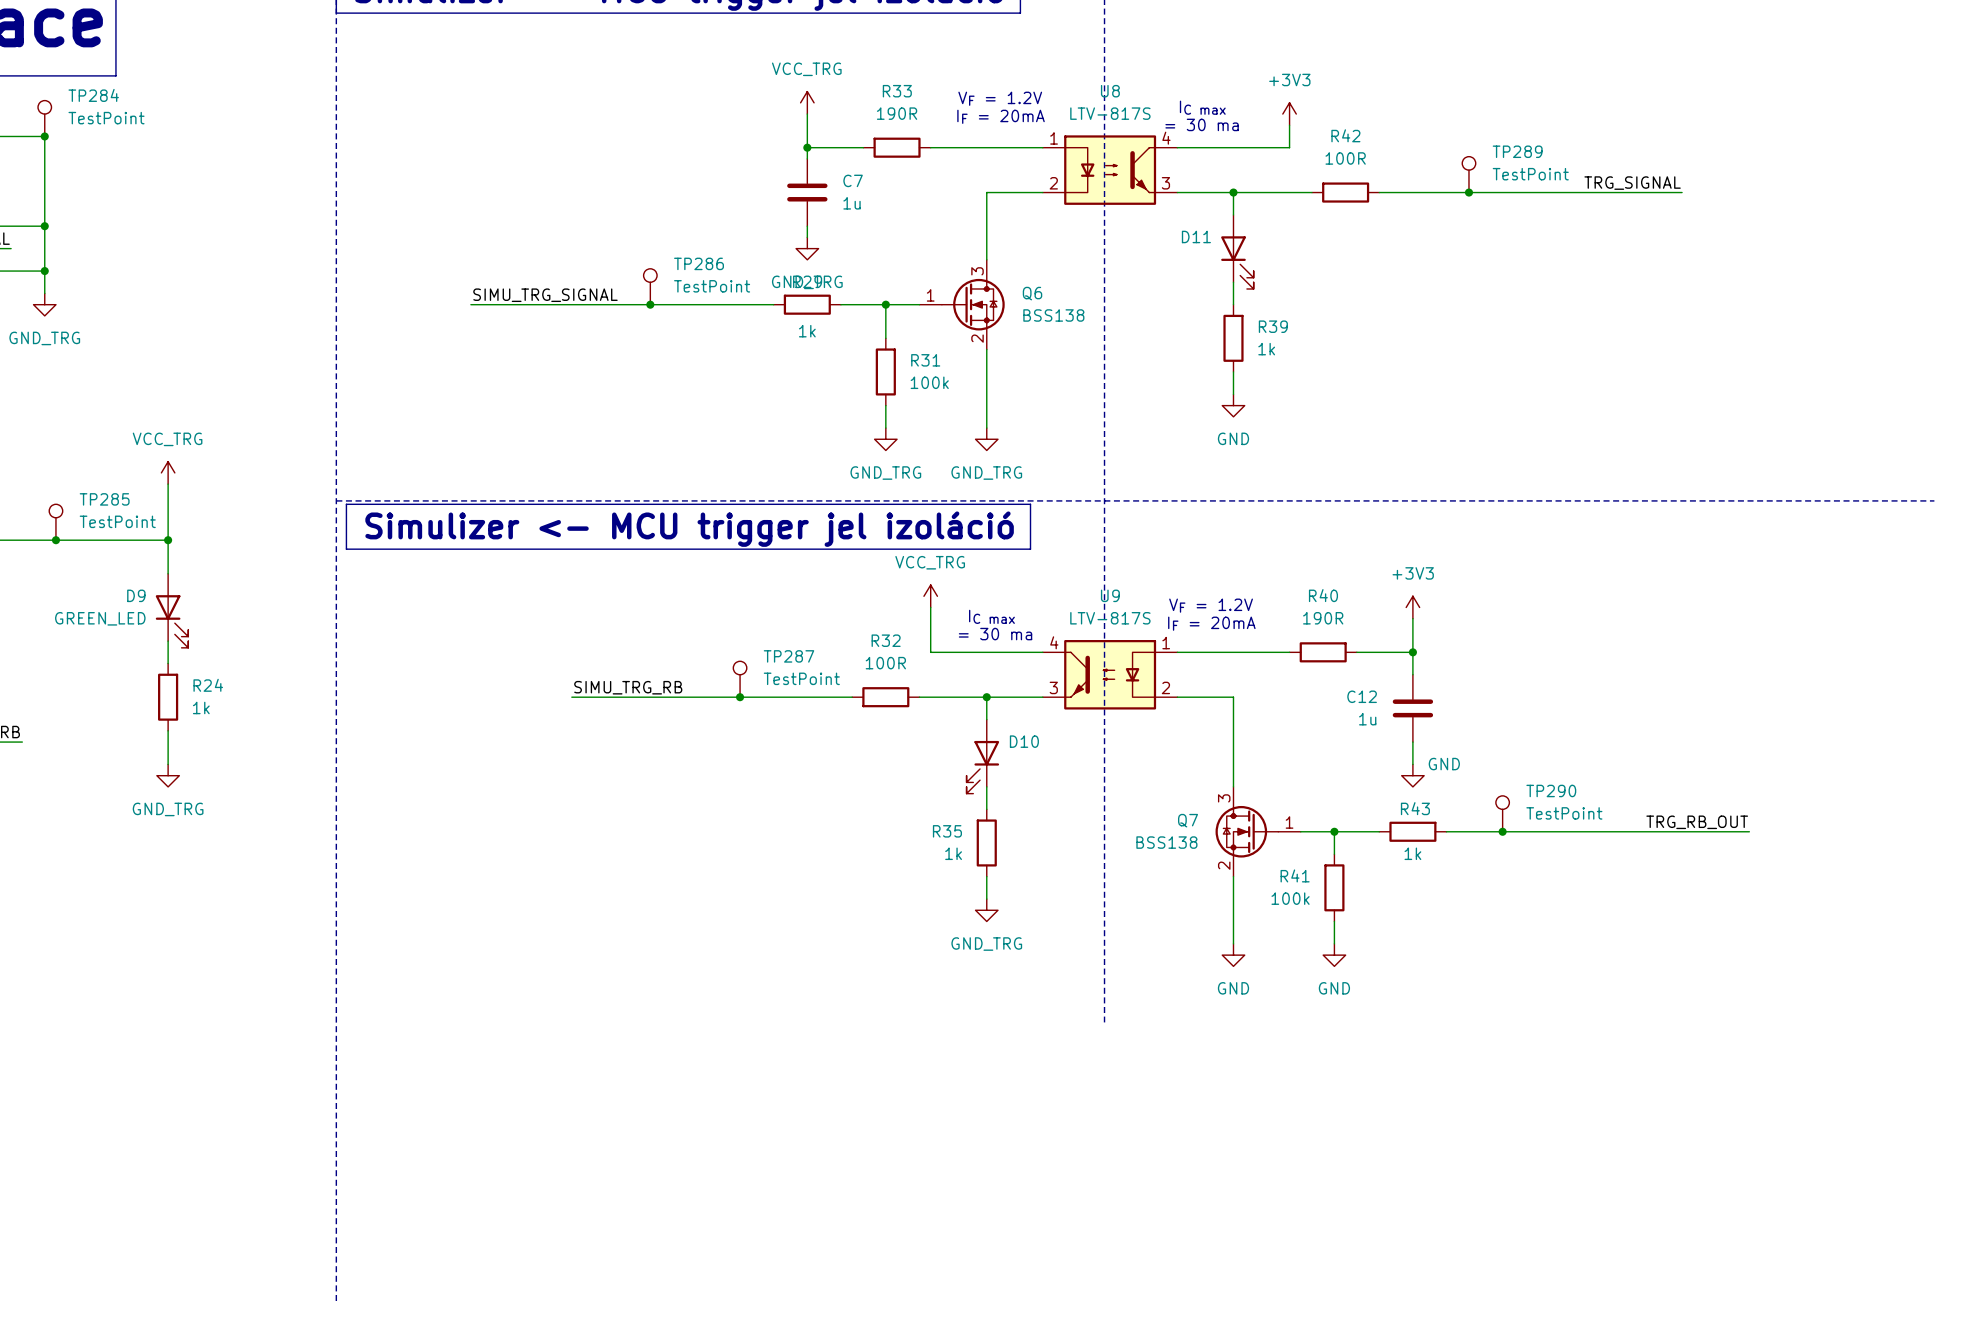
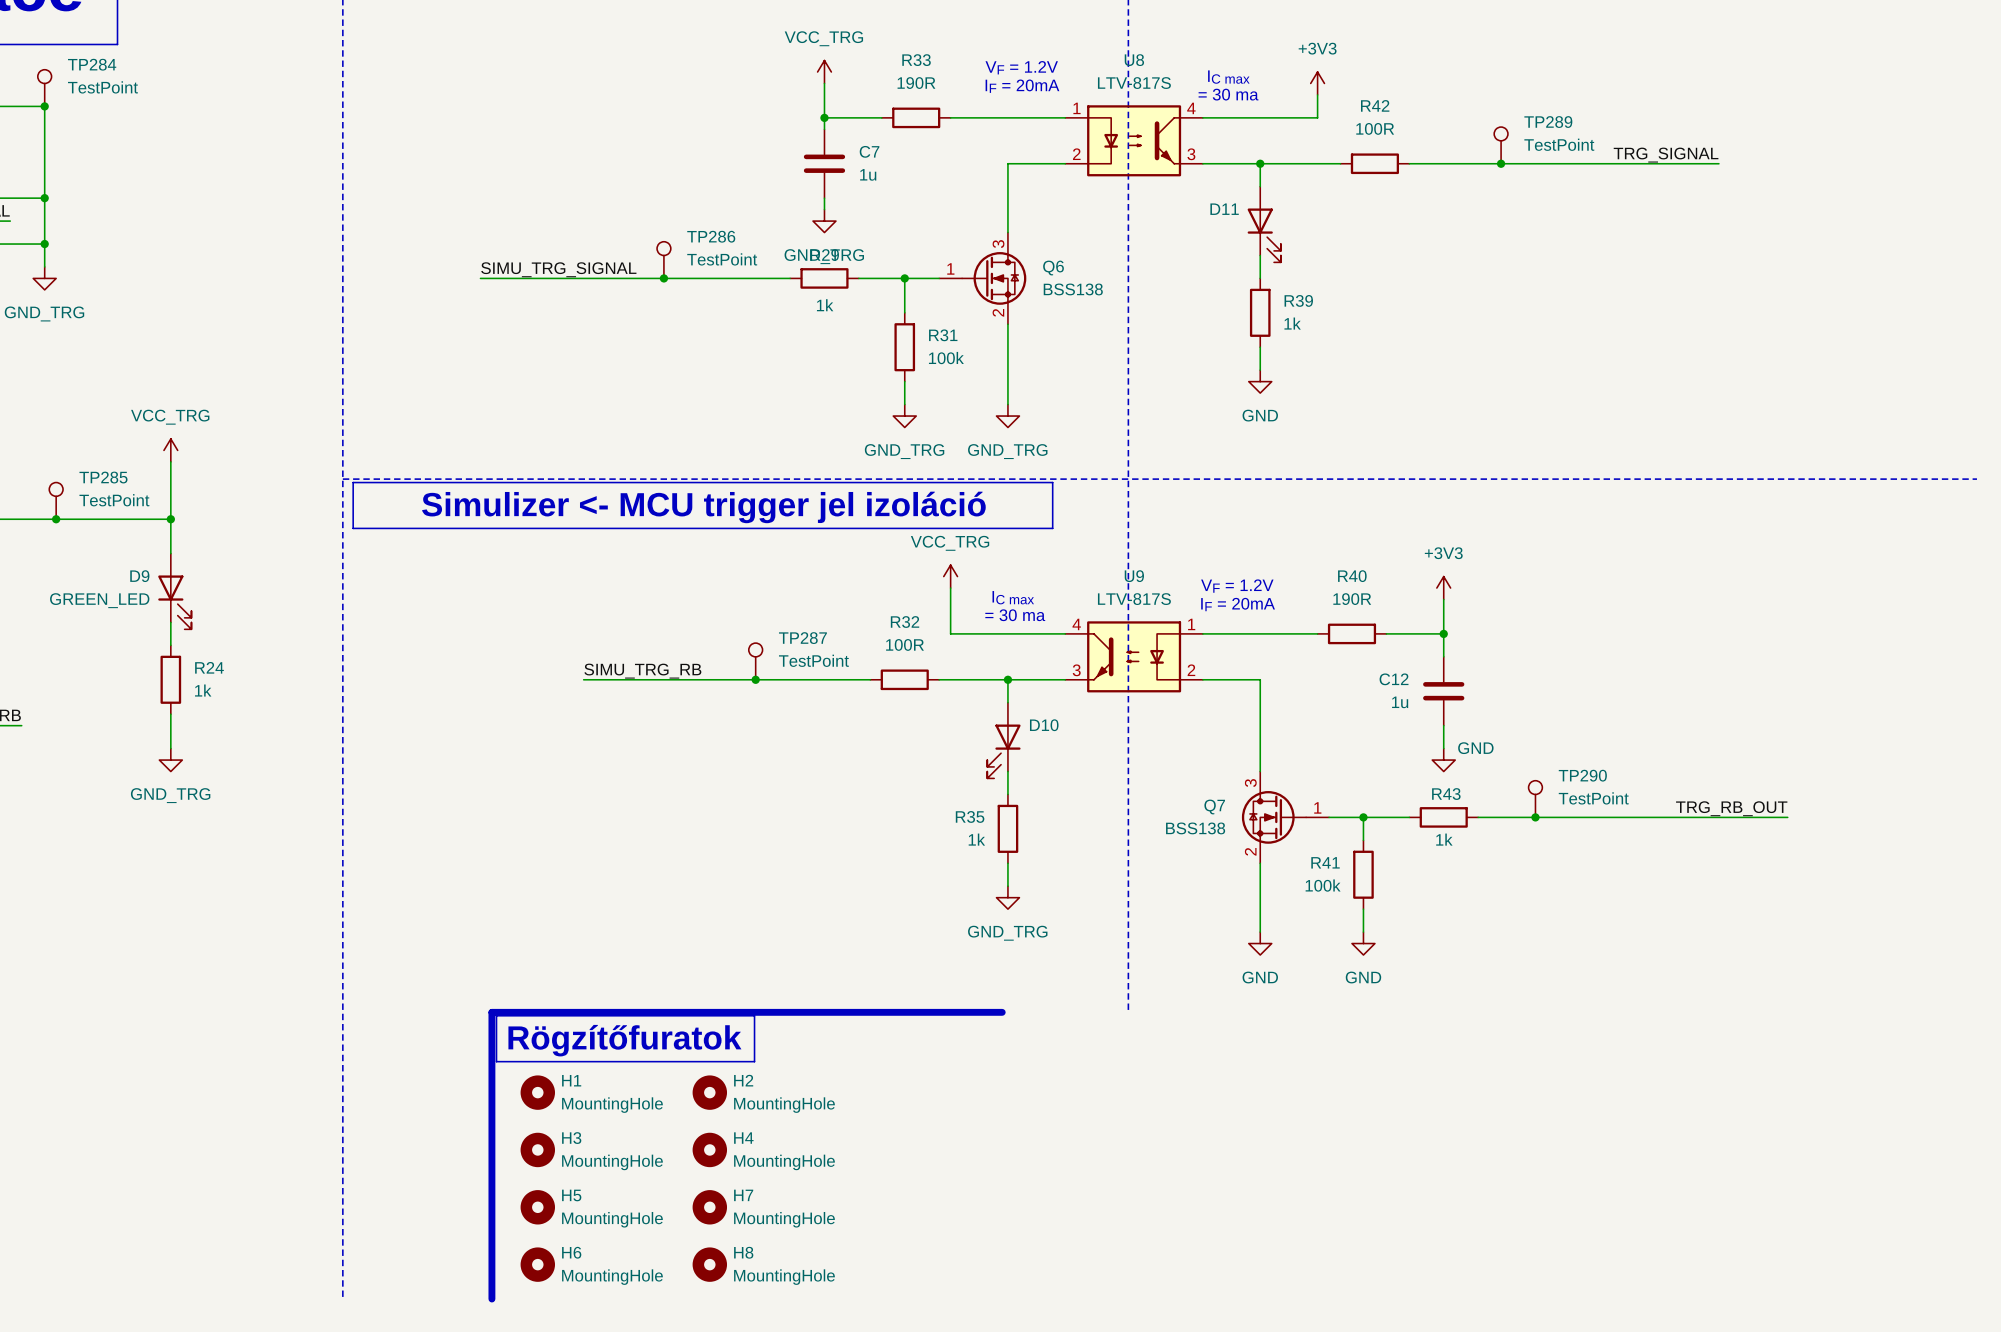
line: none -> (1002, 1012) (491, 1012) (491, 1299)
line: none -> (496, 1015) (754, 1015) (754, 1061) (496, 1061) (496, 1015)
text: none -> Rögzítőfuratok (624, 1040)
H1: none -> MountingHole (537, 1092)
H2: none -> MountingHole (709, 1092)
H3: none -> MountingHole (537, 1149)
H4: none -> MountingHole (709, 1149)
H5: none -> MountingHole (537, 1207)
H7: none -> MountingHole (709, 1207)
H6: none -> MountingHole (537, 1264)
H8: none -> MountingHole (709, 1264)

